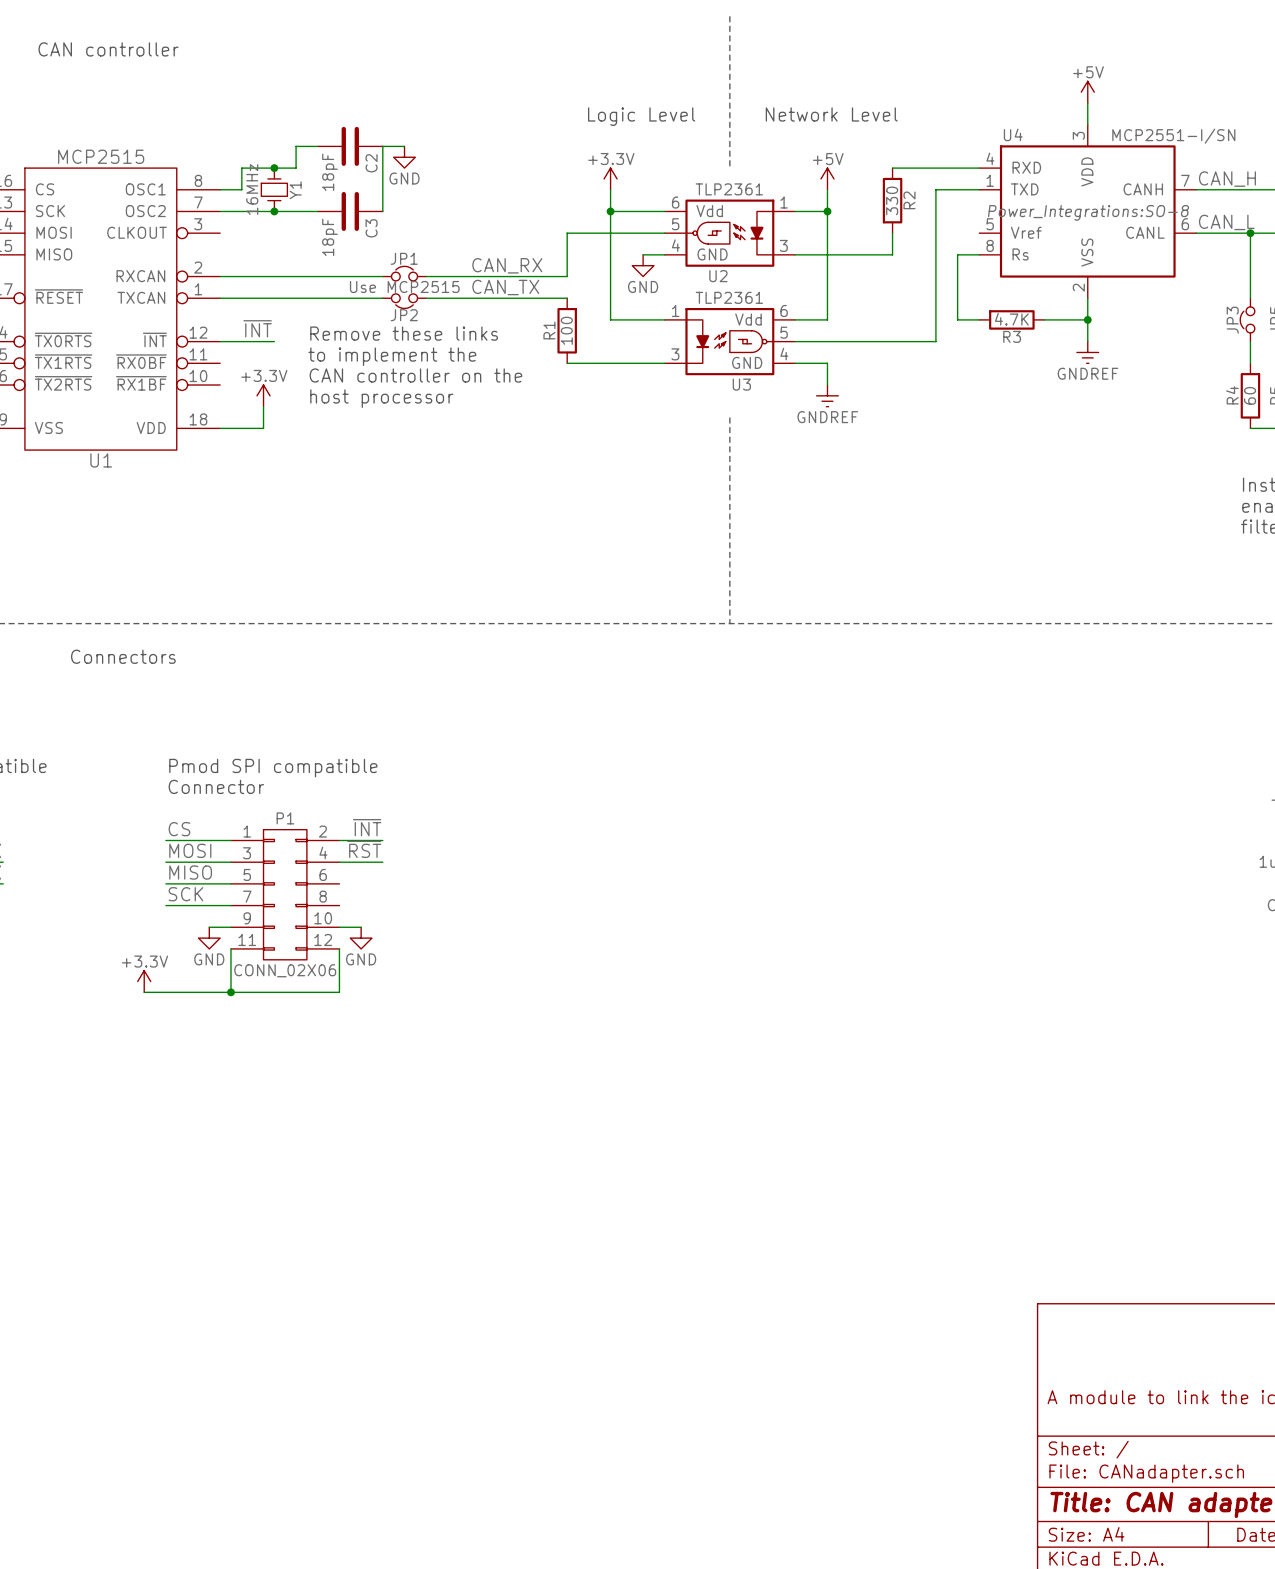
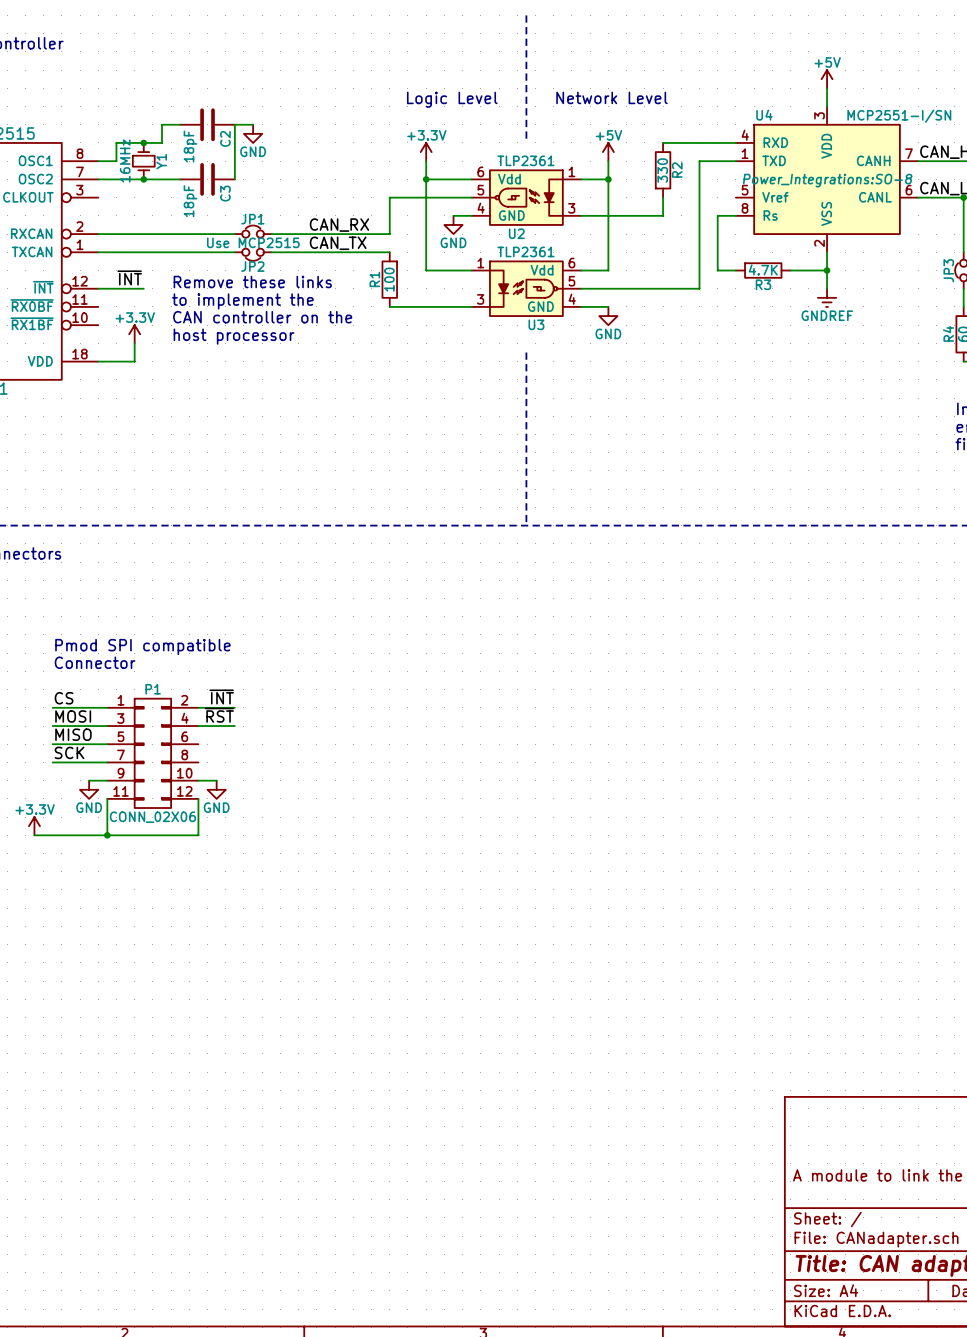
power symbol: none -> GND (608, 316)
power symbol: GNDREF (827, 395) -> none

